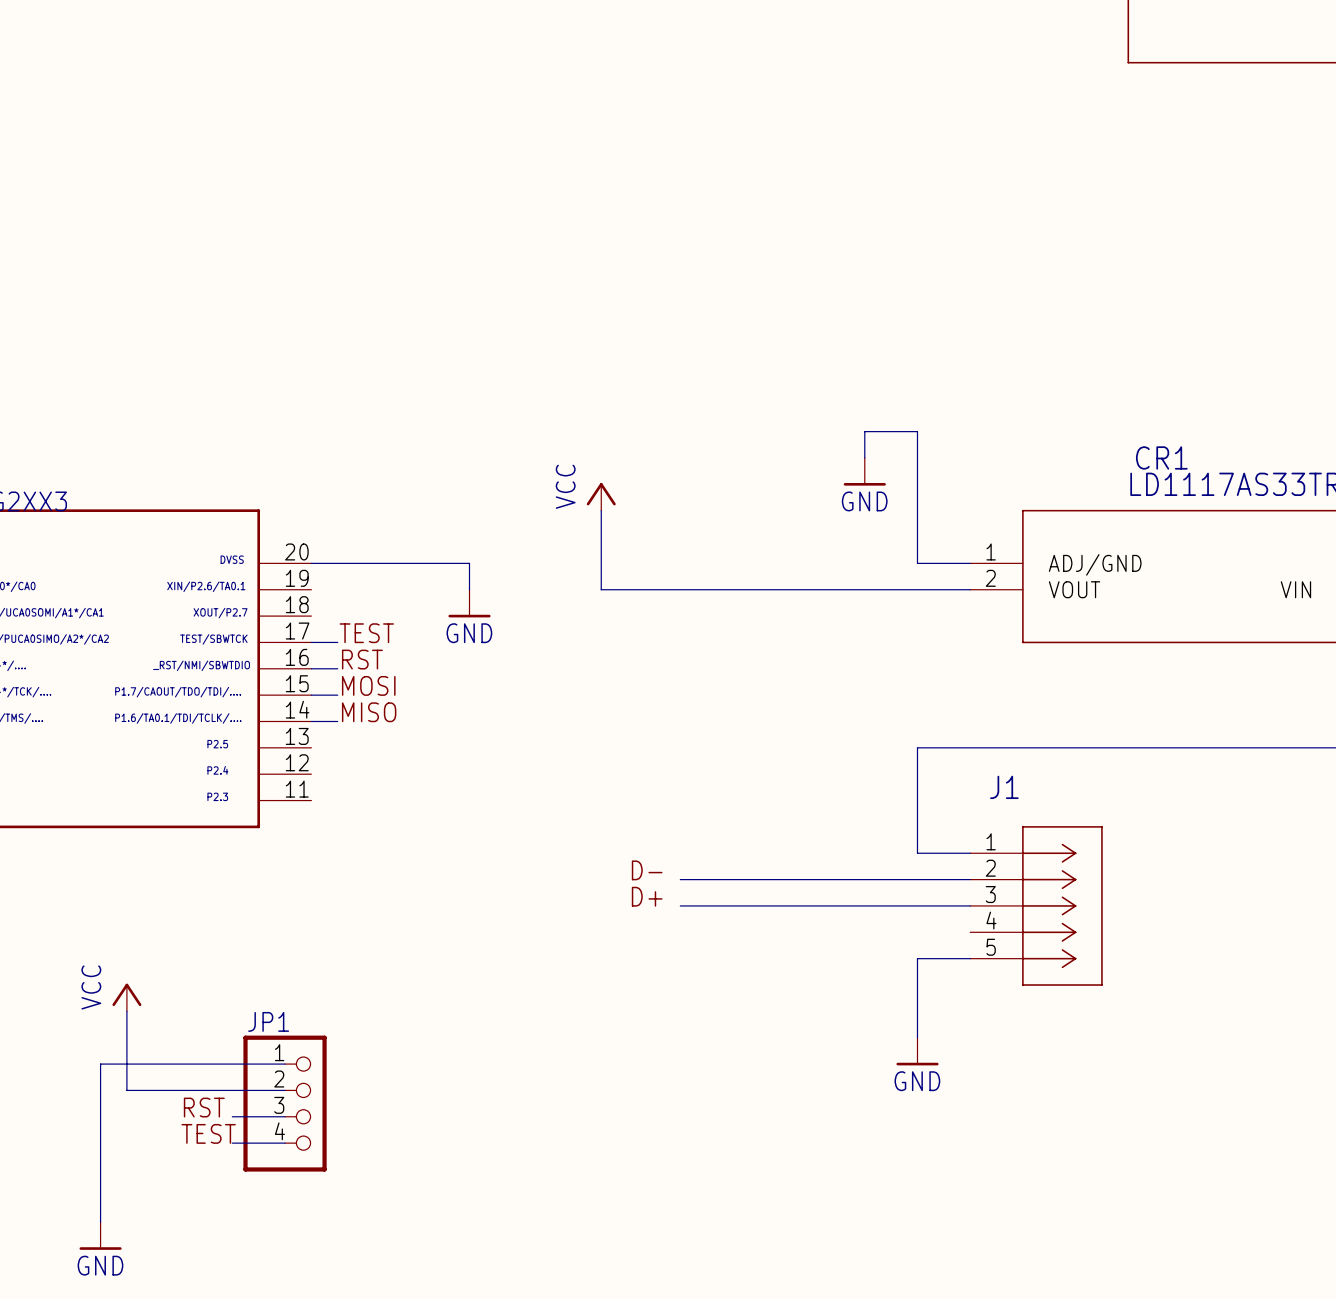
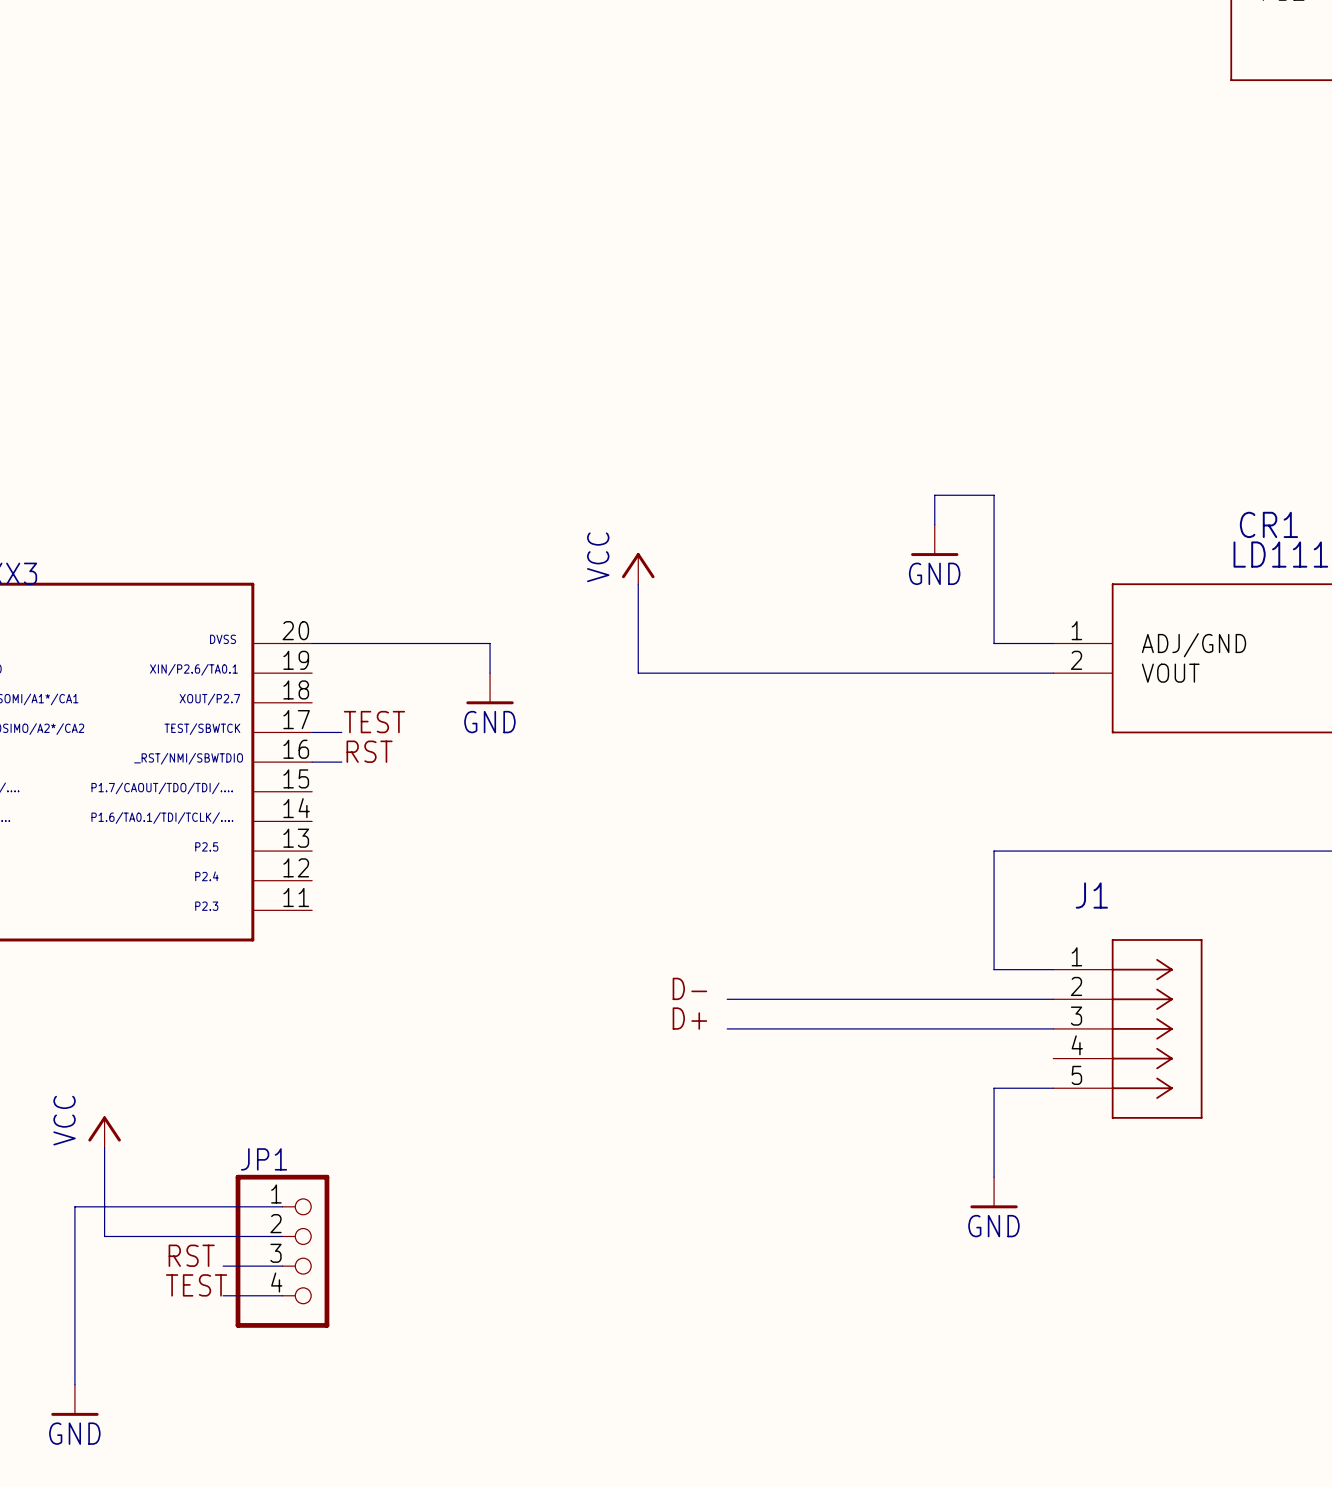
label: MOSI (368, 685) -> none
wire: (311, 695) (337, 695) -> none
label: MISO (369, 712) -> none
wire: (311, 721) (337, 721) -> none

